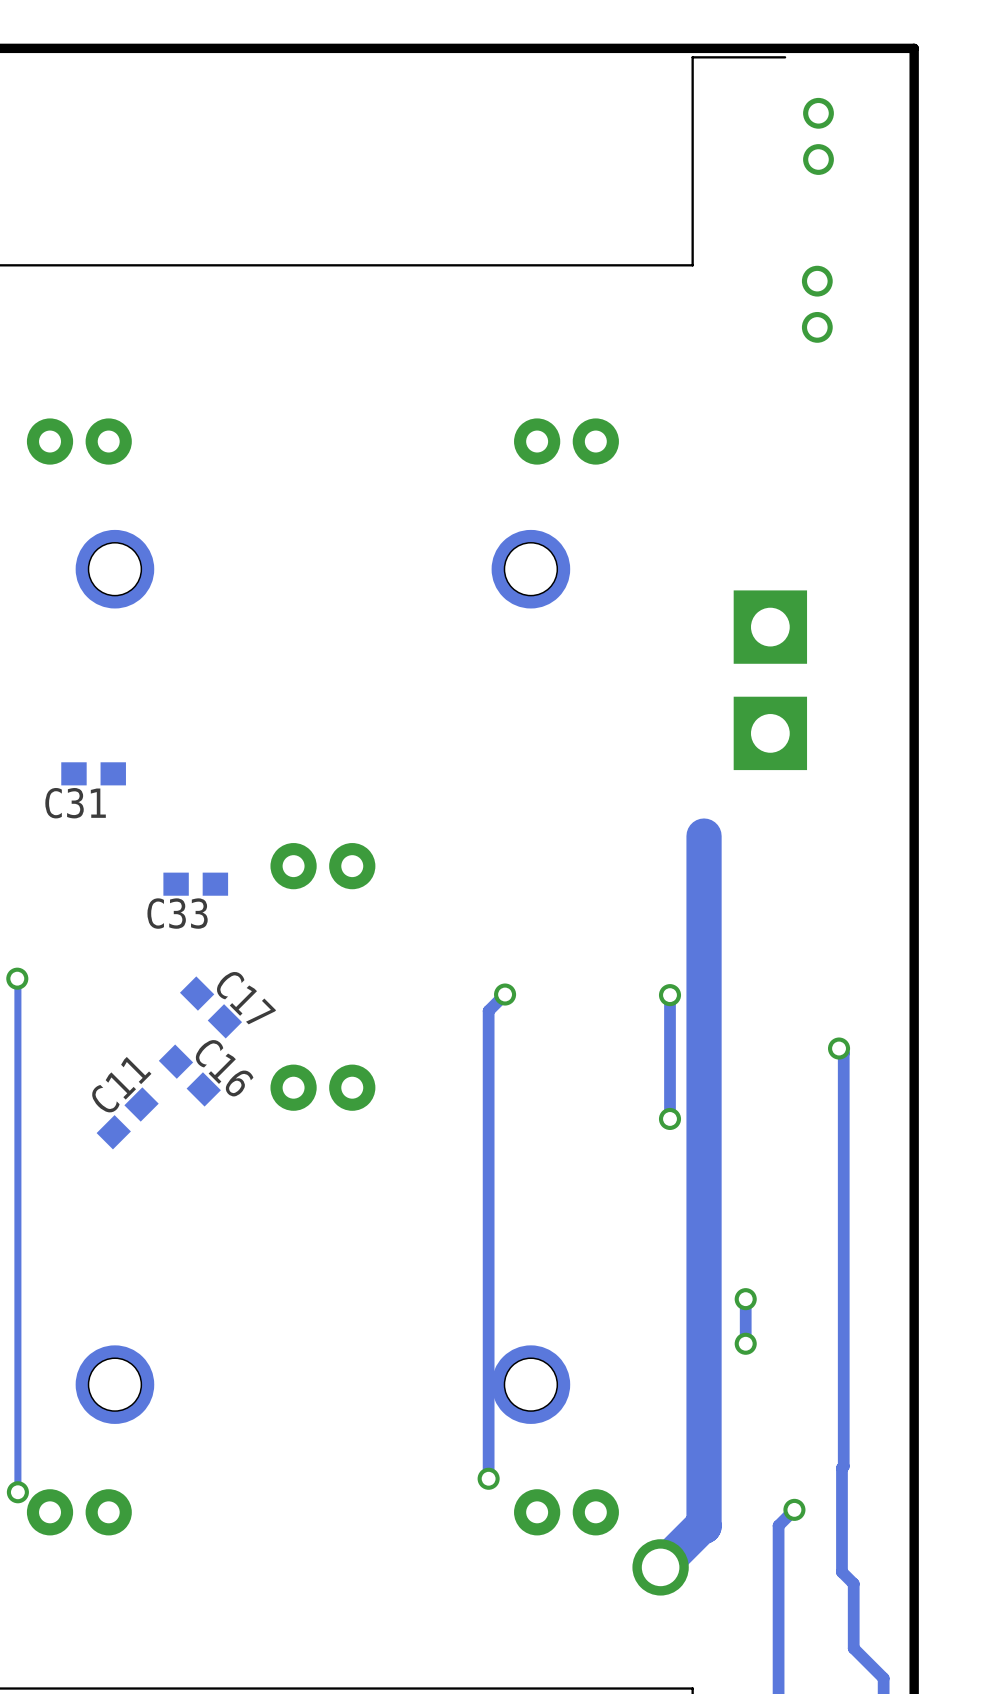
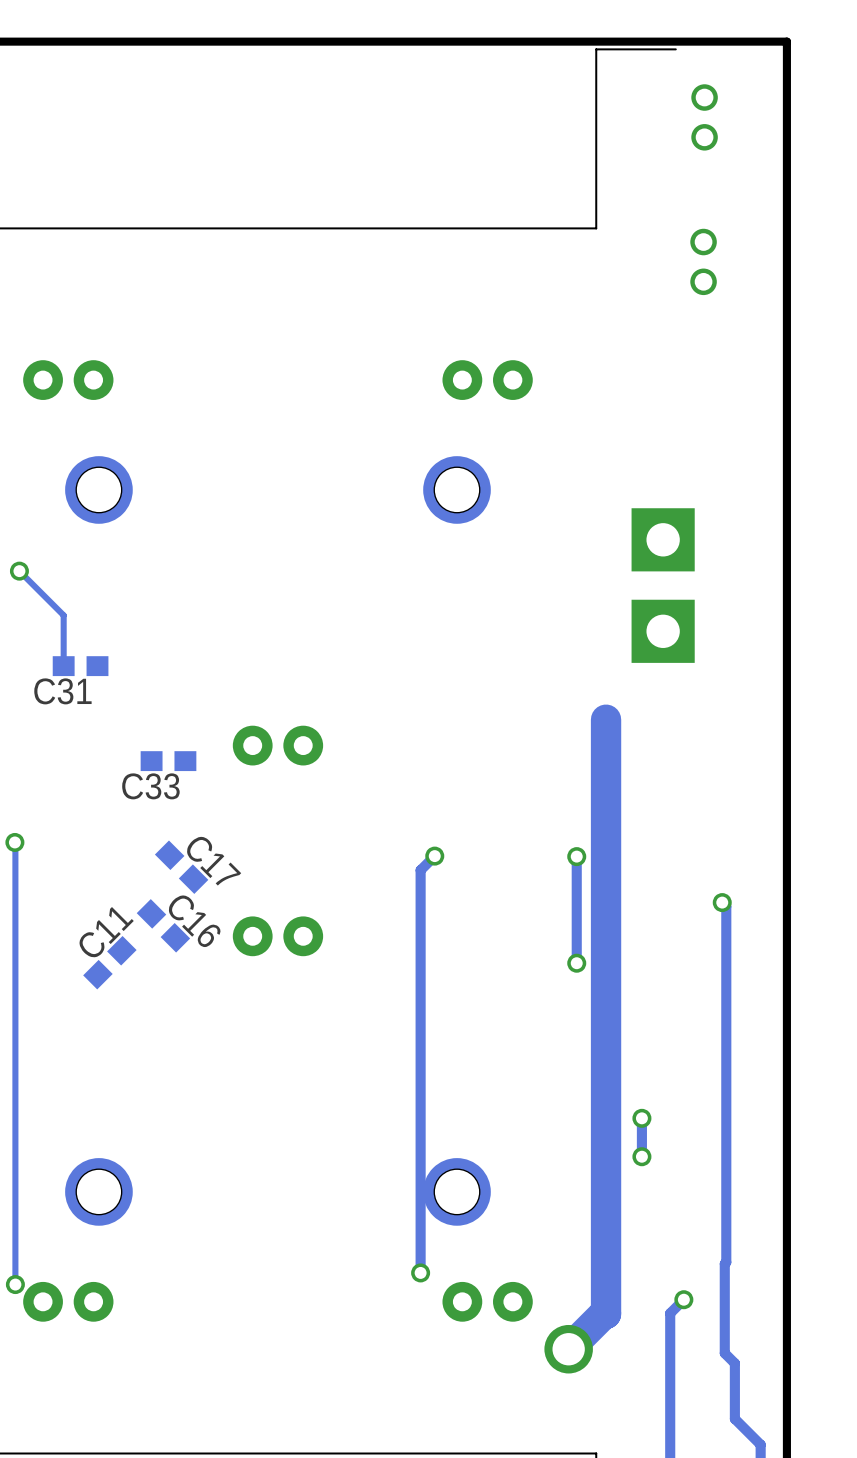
track: none -> (19, 571) (63, 615) (63, 666)
via: none -> (19, 571)

